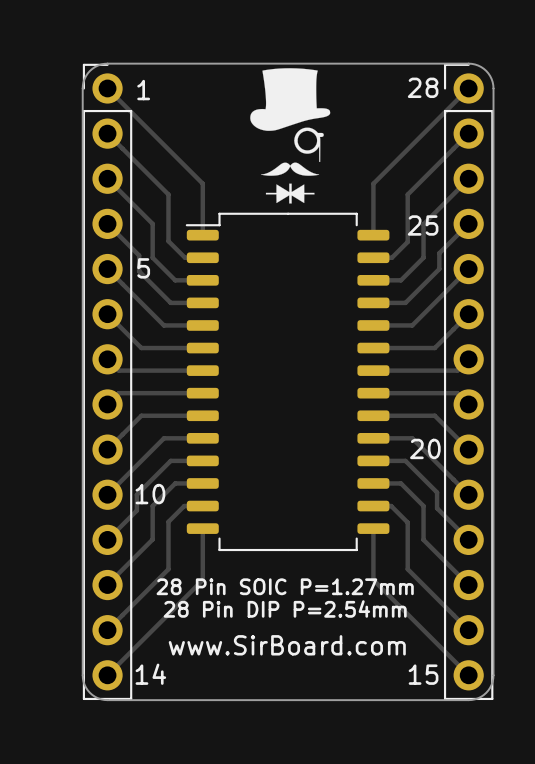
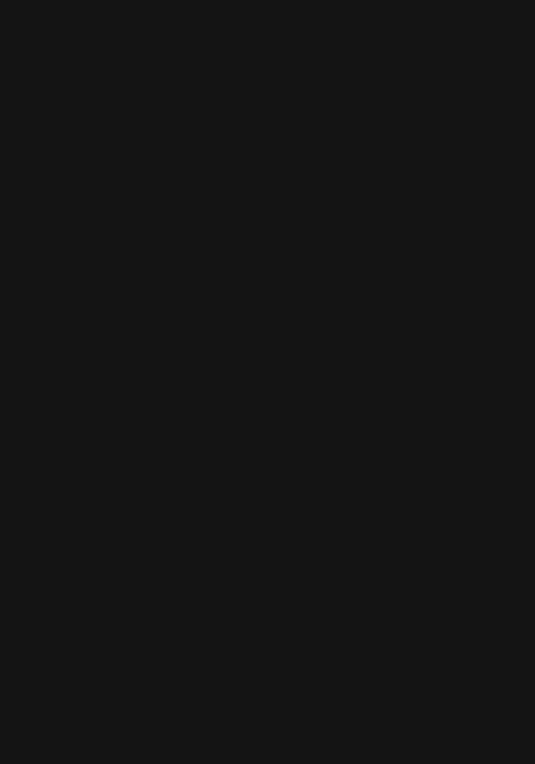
board edge: (107, 63) (468, 63) (481, 66) (490, 76) (493, 88) (493, 675) (490, 687) (481, 696) (468, 700) (107, 700) (95, 696) (86, 687) (82, 675) (82, 88) (84, 78) (89, 70) (98, 65) (107, 63) -> none
drawing: [250, 68, 331, 204] -> none
text: 28 (423, 87) -> none
track: (107, 88) (202, 183) (202, 235) -> none
track: (468, 88) (373, 183) (373, 235) -> none
text: 1 (143, 90) -> none
track: (107, 133) (168, 194) (168, 241) (185, 257) (202, 257) -> none
track: (468, 133) (407, 194) (407, 241) (391, 257) (373, 257) -> none
track: (107, 178) (152, 223) (152, 257) (175, 280) (202, 280) -> none
track: (468, 178) (423, 224) (423, 257) (400, 280) (373, 280) -> none
track: (107, 223) (139, 255) (139, 271) (170, 302) (202, 302) -> none
track: (468, 223) (439, 253) (439, 269) (405, 302) (373, 302) -> none
text: 25 (423, 225) -> none
text: 5 (143, 268) -> none
track: (107, 269) (163, 325) (202, 325) -> none
track: (468, 269) (412, 325) (373, 325) -> none
track: (107, 314) (141, 348) (202, 348) -> none
track: (468, 314) (434, 348) (373, 348) -> none
track: (107, 359) (118, 370) (202, 370) -> none
track: (468, 359) (457, 370) (373, 370) -> none
part: (107, 381) -> none
part: (287, 381) -> none
part: (468, 381) -> none
track: (202, 393) (118, 393) (107, 404) -> none
track: (373, 393) (457, 393) (468, 404) -> none
track: (202, 415) (141, 415) (107, 449) -> none
track: (373, 415) (434, 415) (468, 449) -> none
track: (202, 438) (163, 438) (107, 494) -> none
track: (373, 438) (412, 438) (468, 494) -> none
text: 20 (425, 448) -> none
track: (202, 460) (170, 460) (136, 494) (136, 510) (107, 539) -> none
track: (373, 460) (405, 460) (437, 492) (437, 508) (468, 539) -> none
track: (202, 483) (175, 483) (152, 506) (152, 539) (107, 585) -> none
track: (373, 483) (400, 483) (423, 506) (423, 539) (468, 585) -> none
text: 10 (150, 494) -> none
track: (202, 506) (184, 506) (168, 521) (168, 569) (107, 630) -> none
track: (373, 506) (391, 506) (407, 522) (407, 569) (468, 630) -> none
track: (202, 528) (202, 580) (107, 675) -> none
track: (373, 528) (373, 580) (468, 675) -> none
text: 28 Pin SOIC P=1.27mm (285, 586) -> none
text: 28 Pin DIP P=2.54mm (285, 608) -> none
text: www.SirBoard.com (287, 645) -> none
text: 14 (150, 674) -> none
text: 15 (423, 674) -> none

